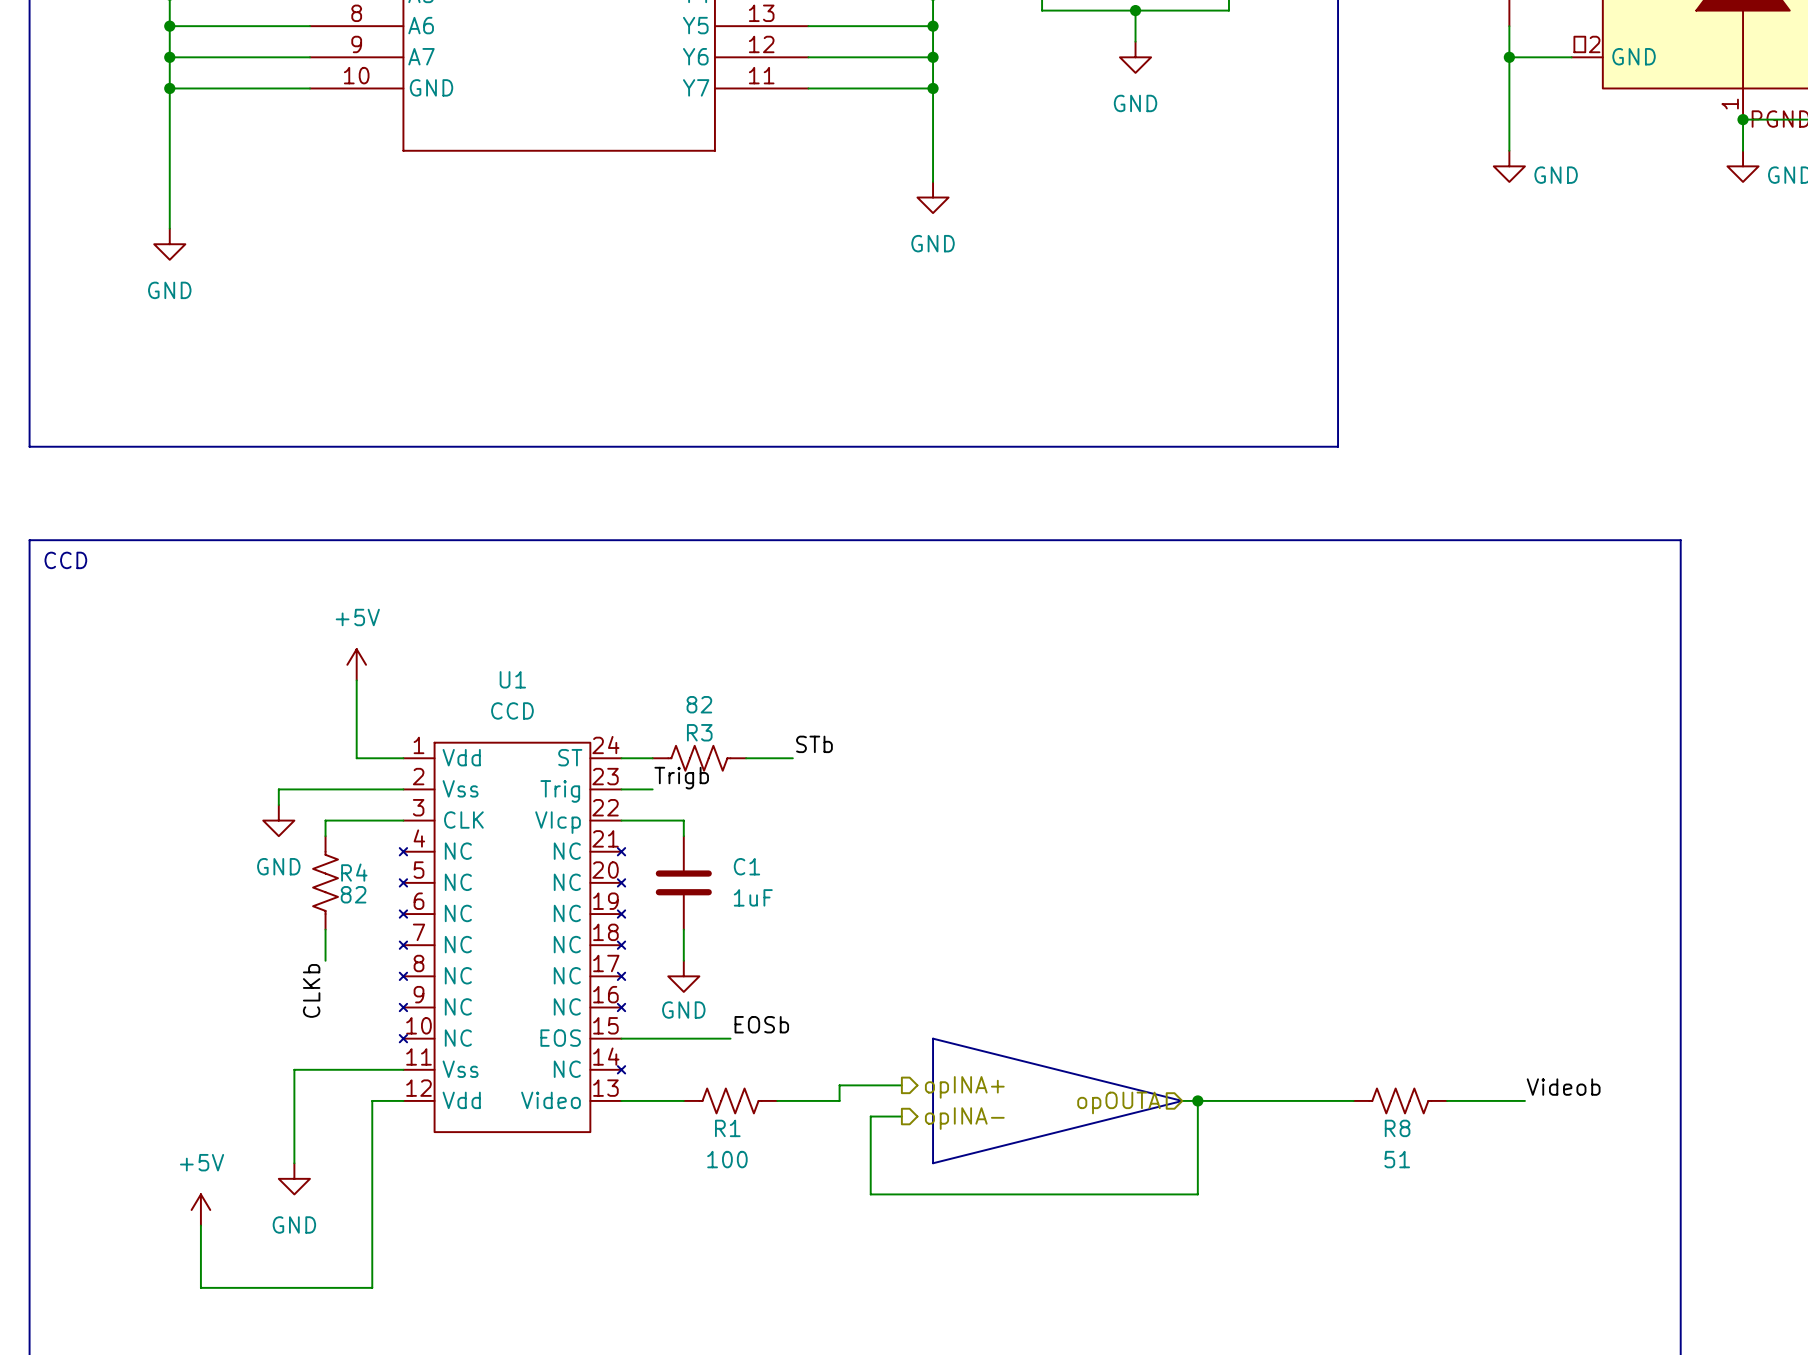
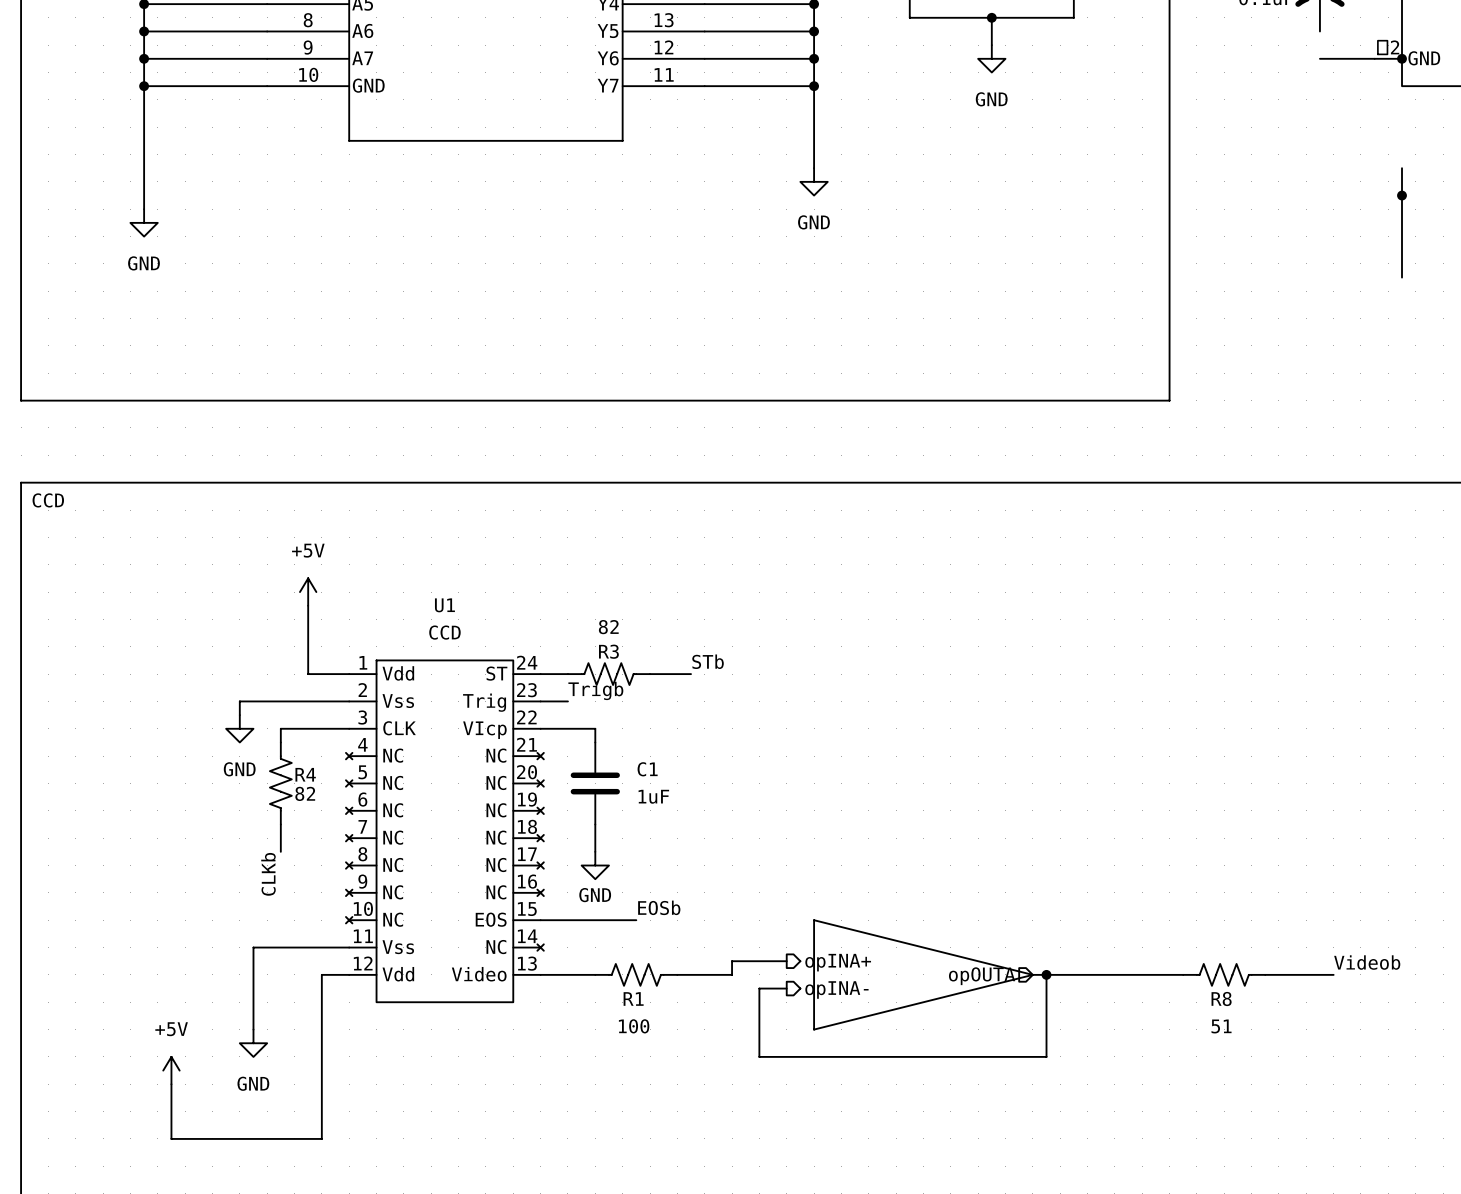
wire: (1509, 26) (1509, 150) -> (1402, 168) (1402, 277)
junction: (1509, 57) -> none
junction: none -> (1402, 58)
power symbol: GND (1509, 166) -> none
junction: none -> (1402, 195)

